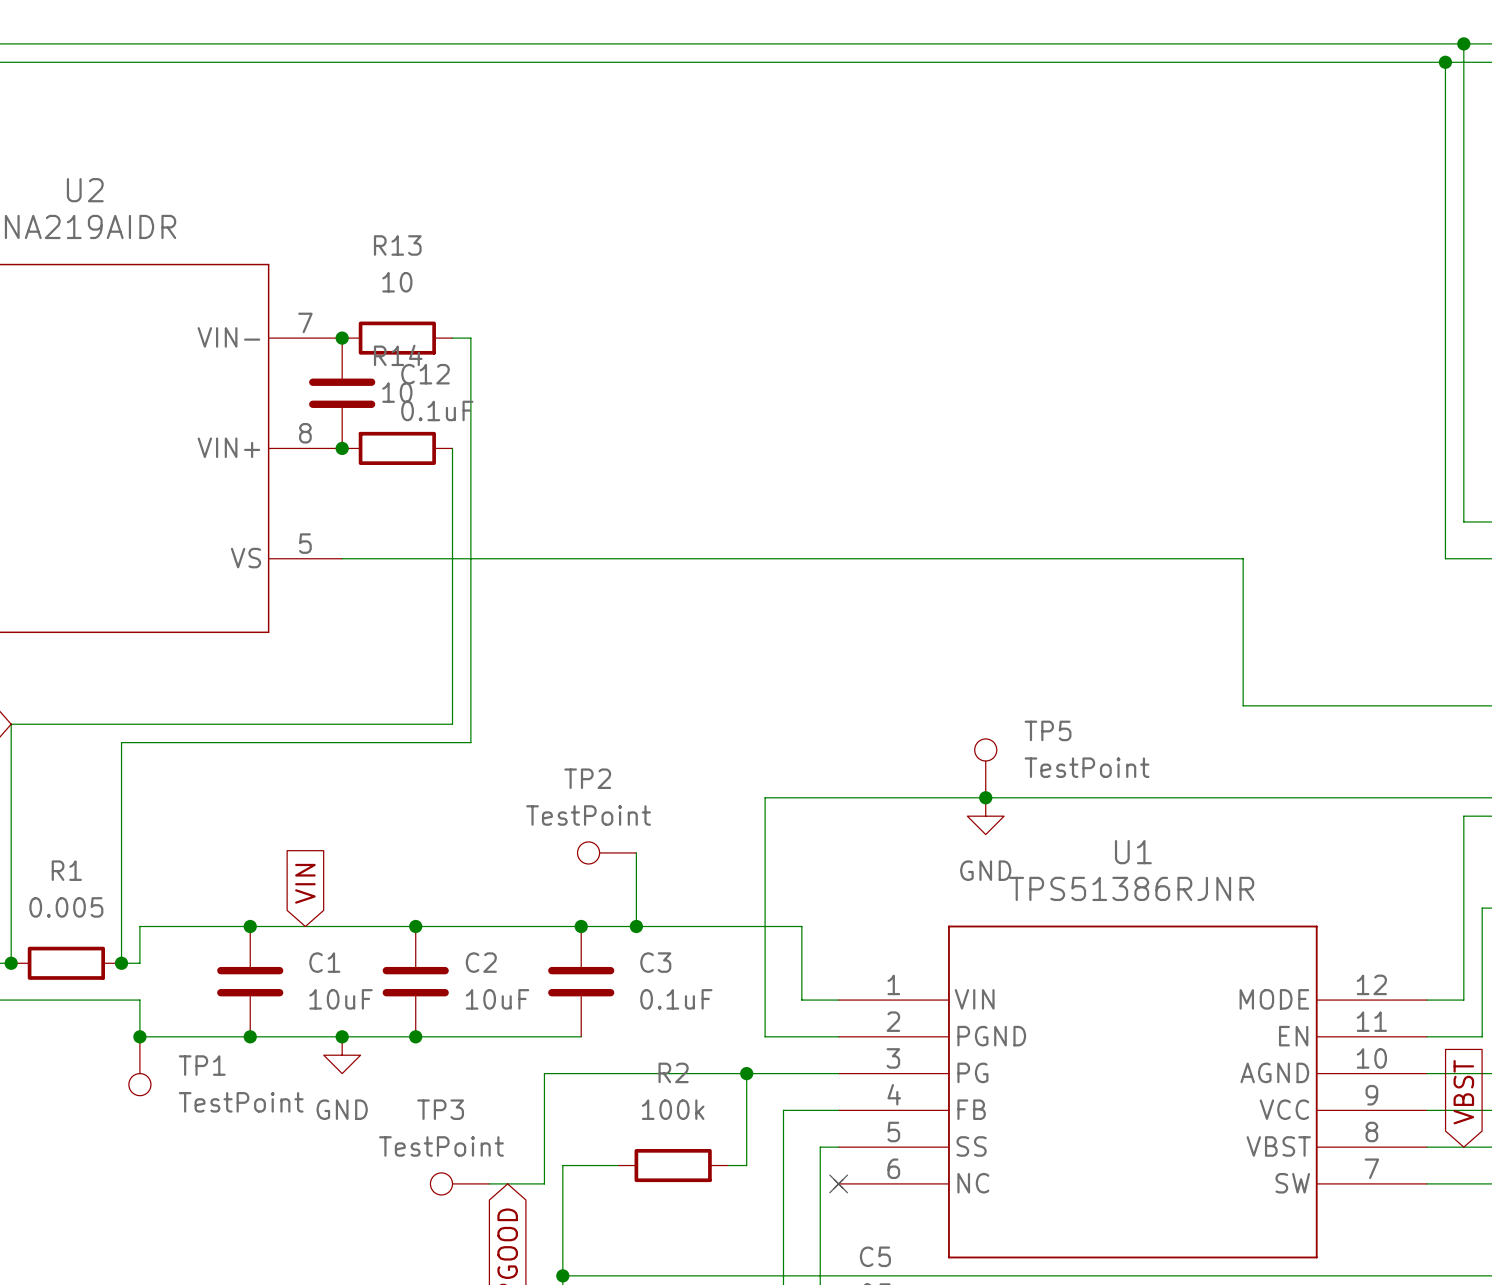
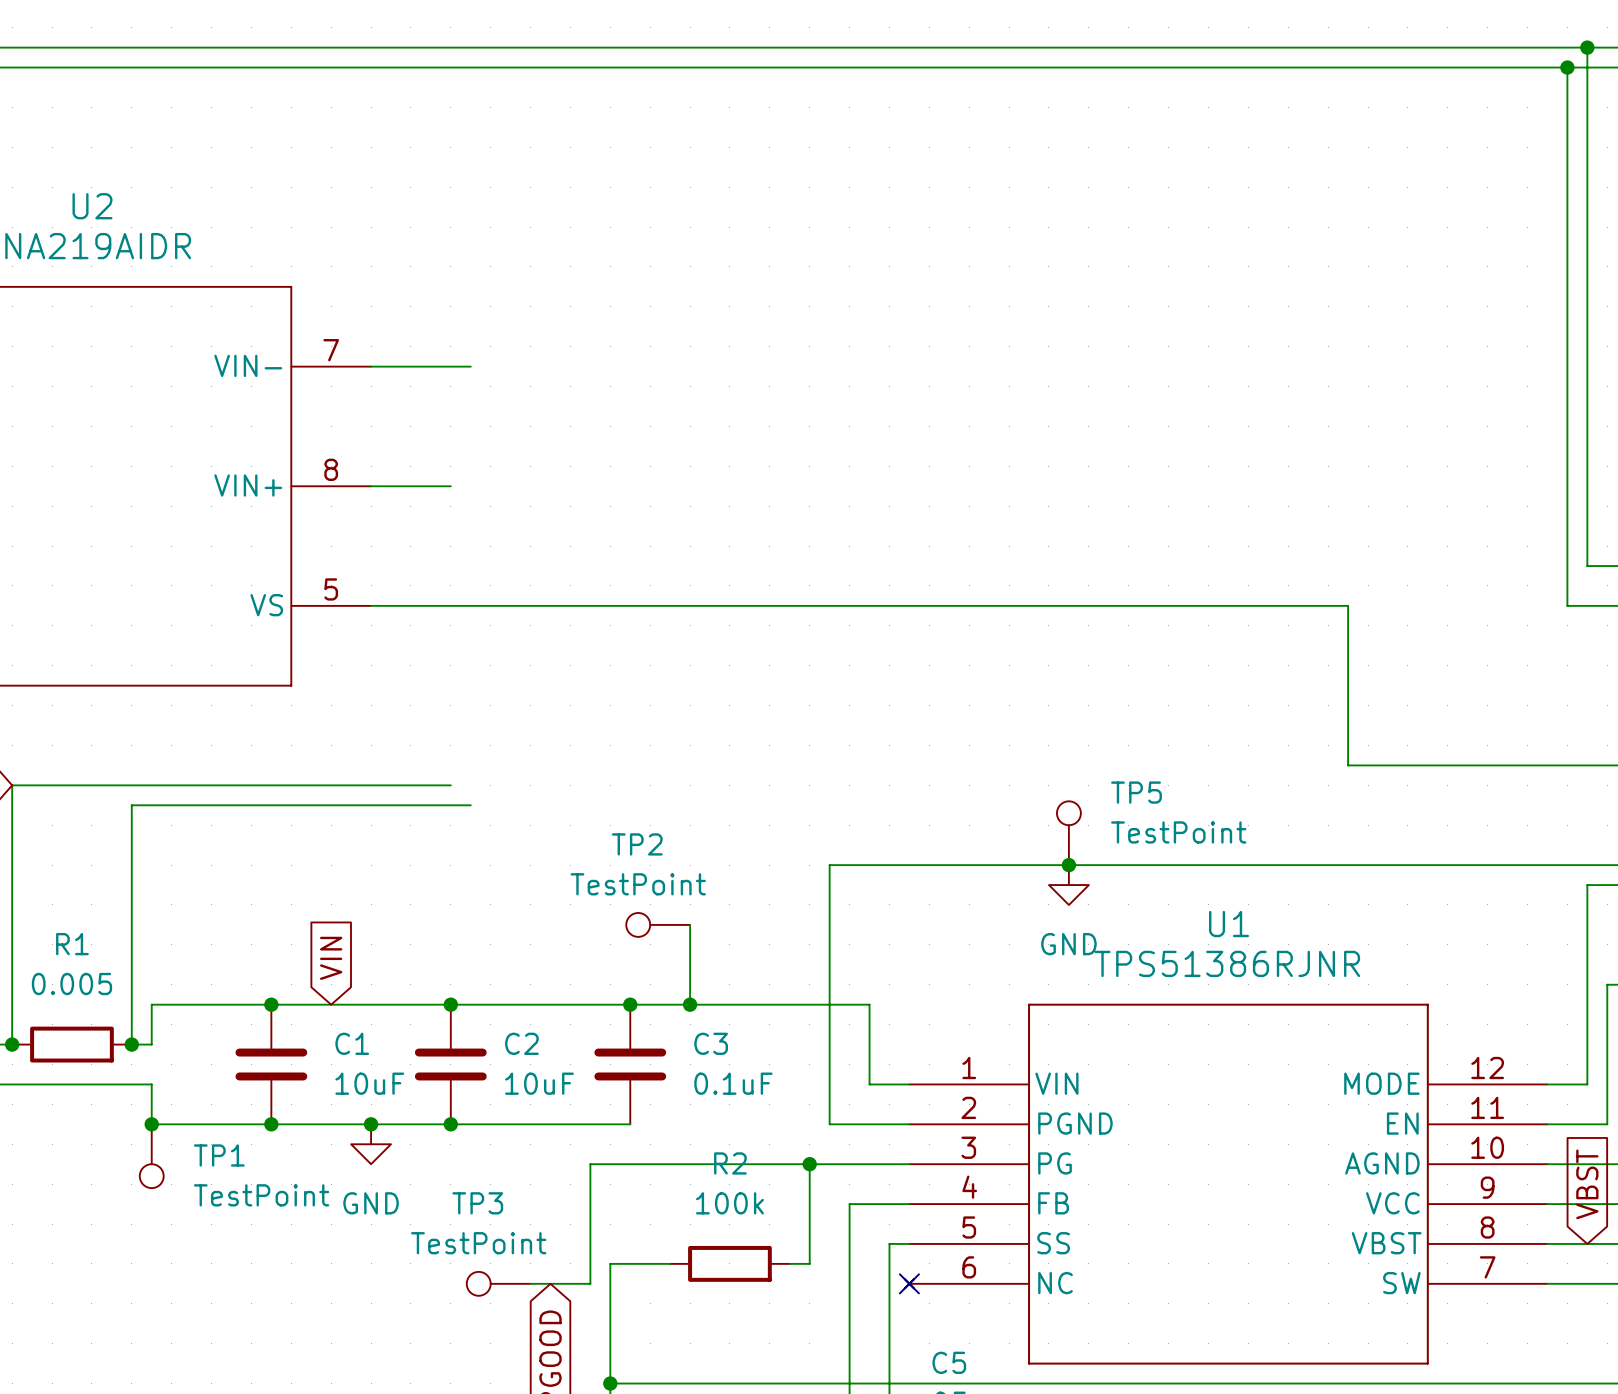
wire: none -> (371, 366) (470, 366)
junction: (342, 338) -> none
R13: 10 (397, 338) -> none
wire: (452, 338) (470, 338) (470, 742) (434, 742) -> none
C12: 0.1uF (342, 393) -> none
wire: none -> (371, 486) (450, 486)
junction: (342, 448) -> none
R14: 10 (397, 448) -> none
wire: (452, 448) (452, 724) (415, 724) -> none

